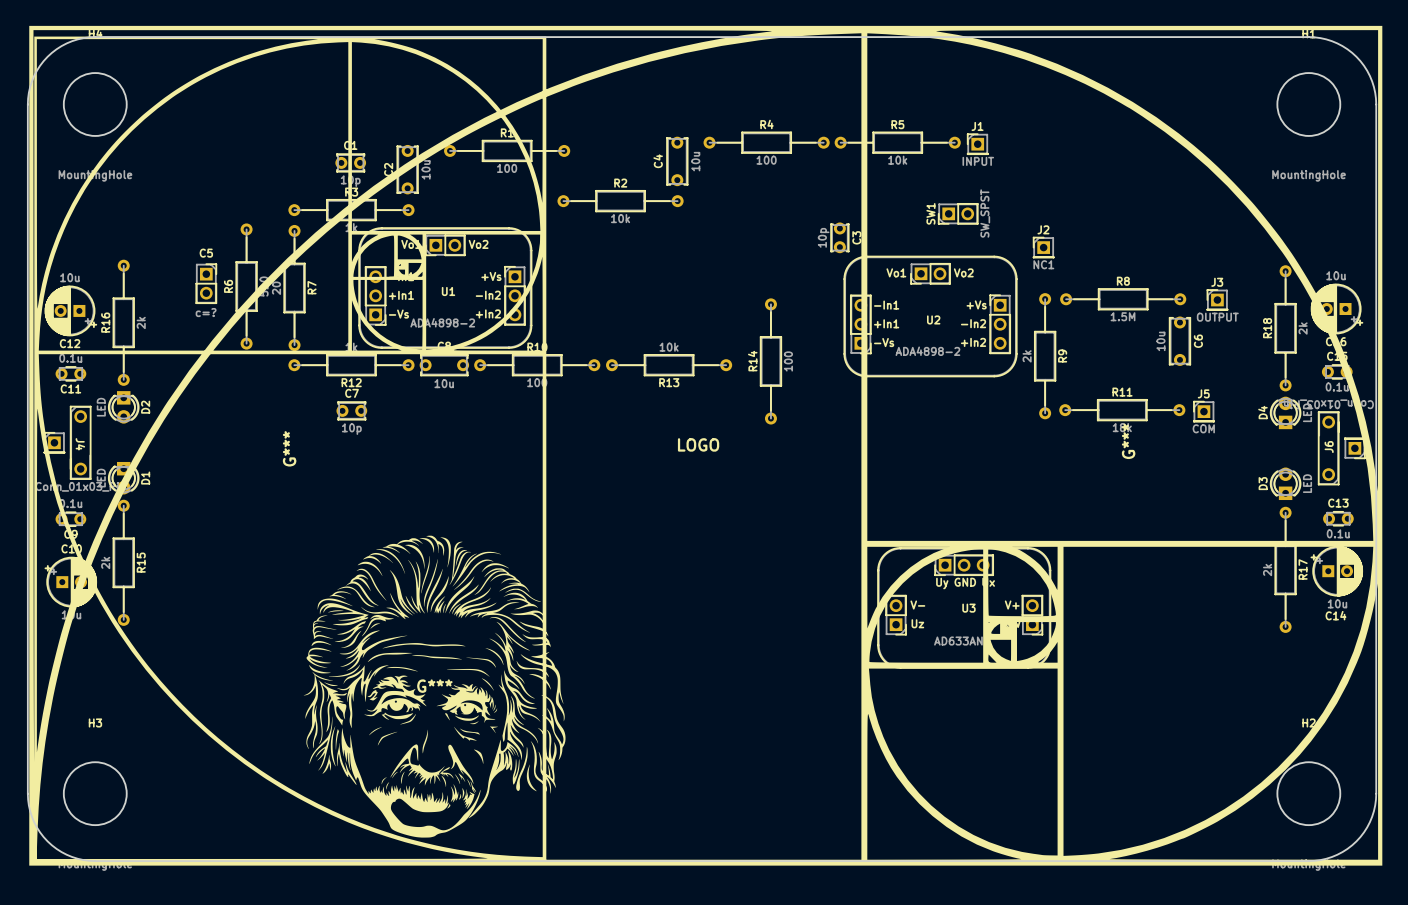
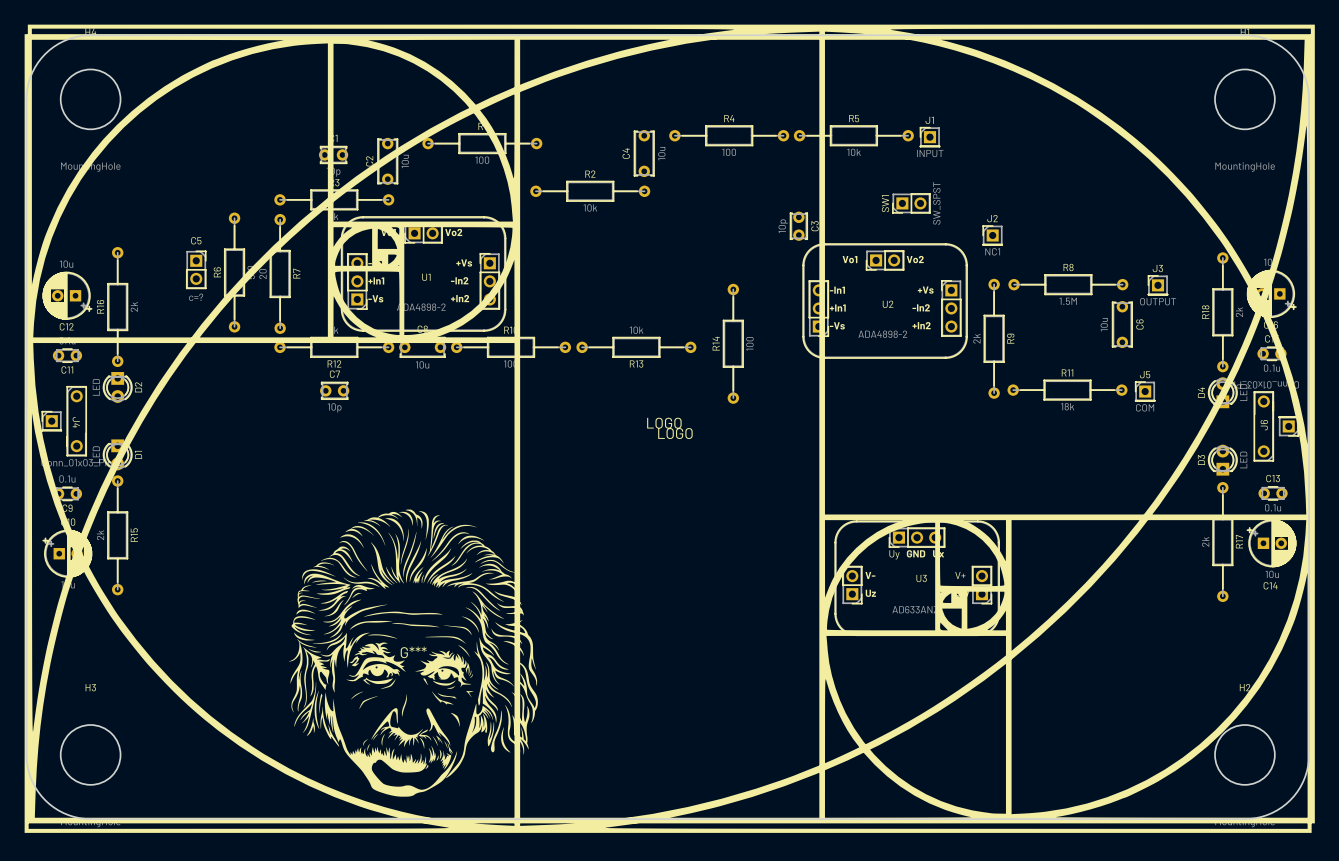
drawing: none -> [24, 34, 1312, 833]
G***: (1128, 441) -> none
G***: (290, 449) -> none

